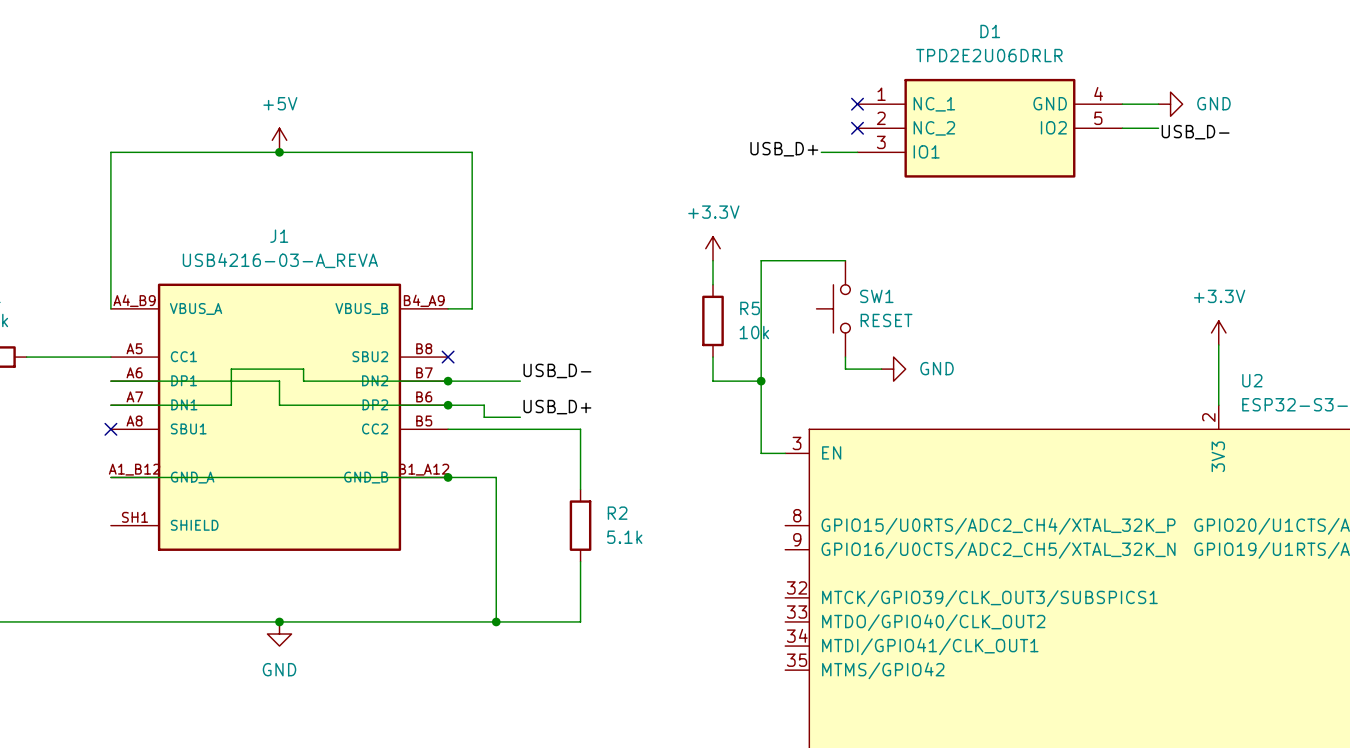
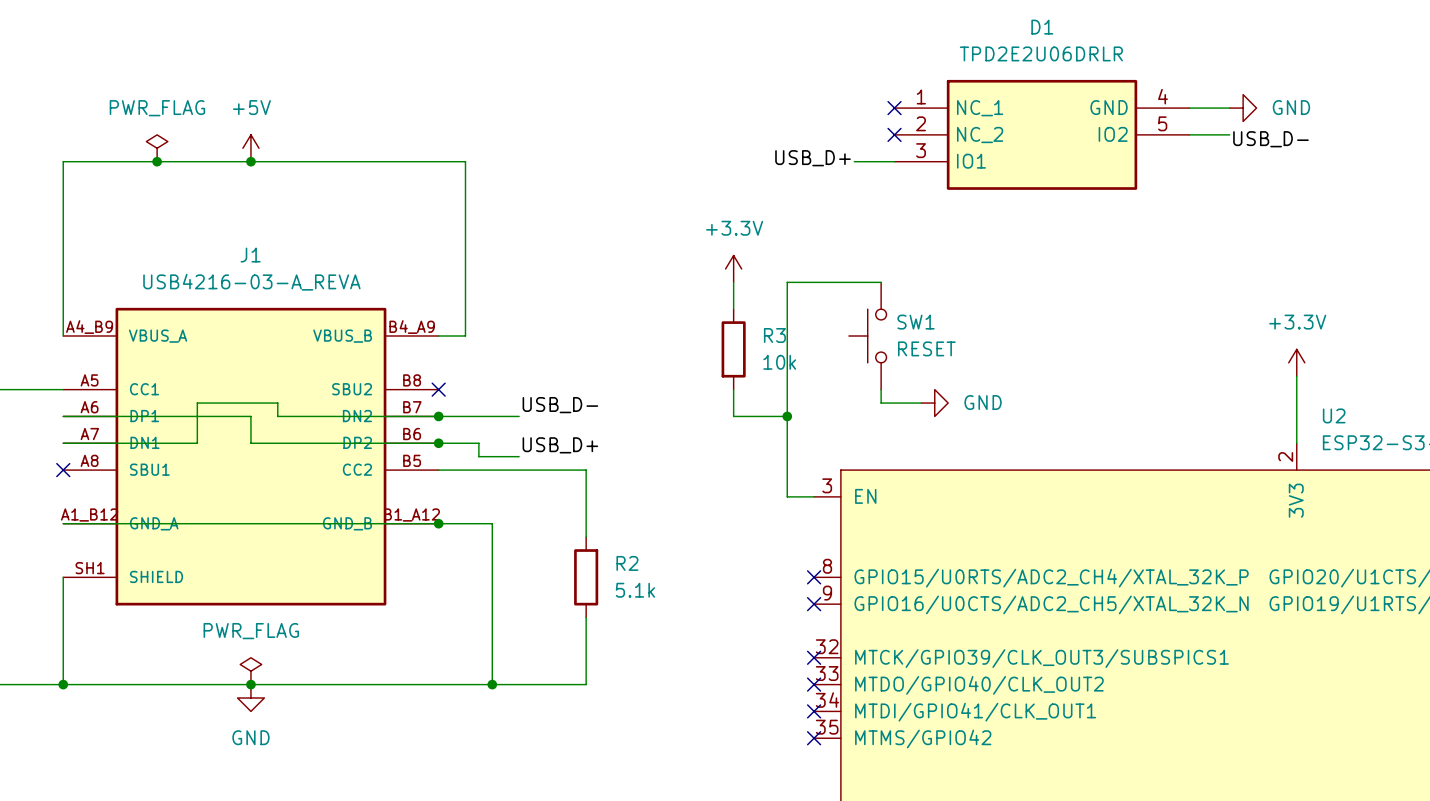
power symbol: none -> PWR_FLAG (157, 148)
junction: none -> (157, 161)
R5 name: R5 (750, 308) -> R3 (774, 335)
wire: none -> (63, 577) (63, 684)
no-connect mark: none -> (814, 577)
no-connect mark: none -> (814, 604)
no-connect mark: none -> (814, 657)
power symbol: none -> PWR_FLAG (250, 671)
junction: none -> (63, 684)
no-connect mark: none -> (814, 684)
no-connect mark: none -> (814, 711)
no-connect mark: none -> (814, 738)

